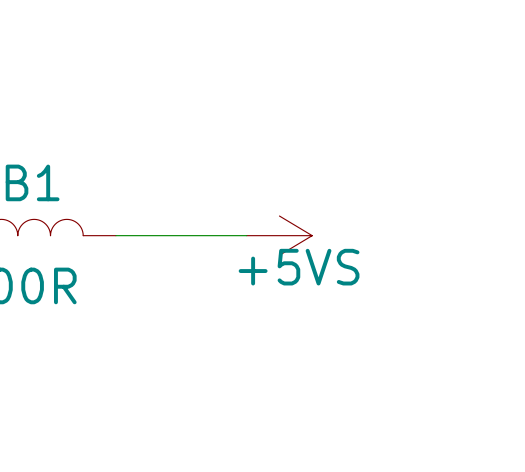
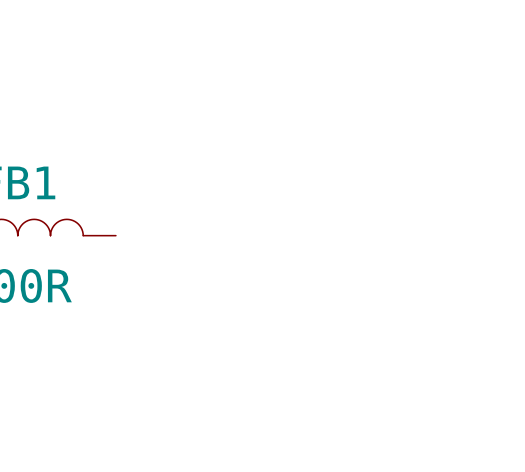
wire: (115, 235) (246, 235) -> none
power symbol: +5VS (279, 235) -> none

